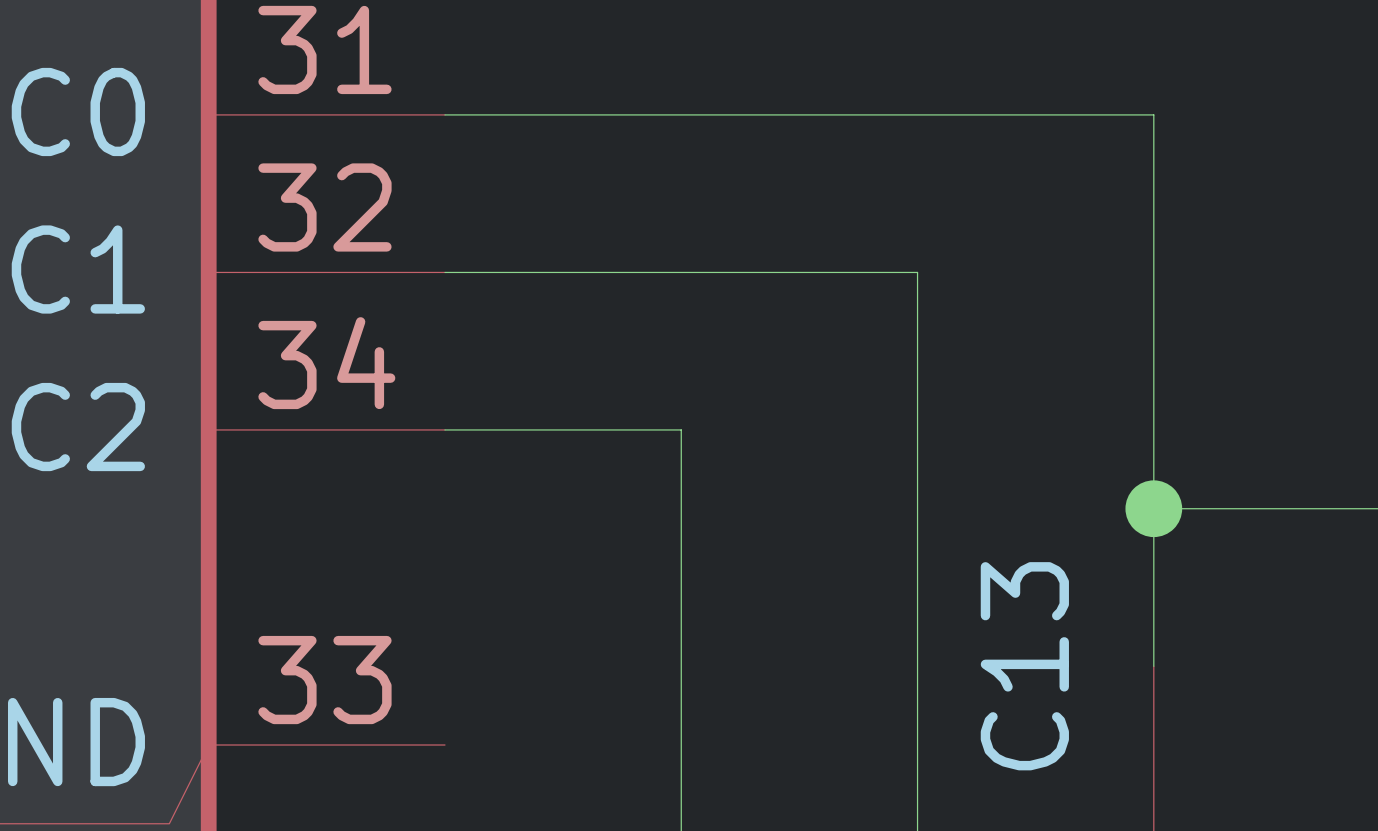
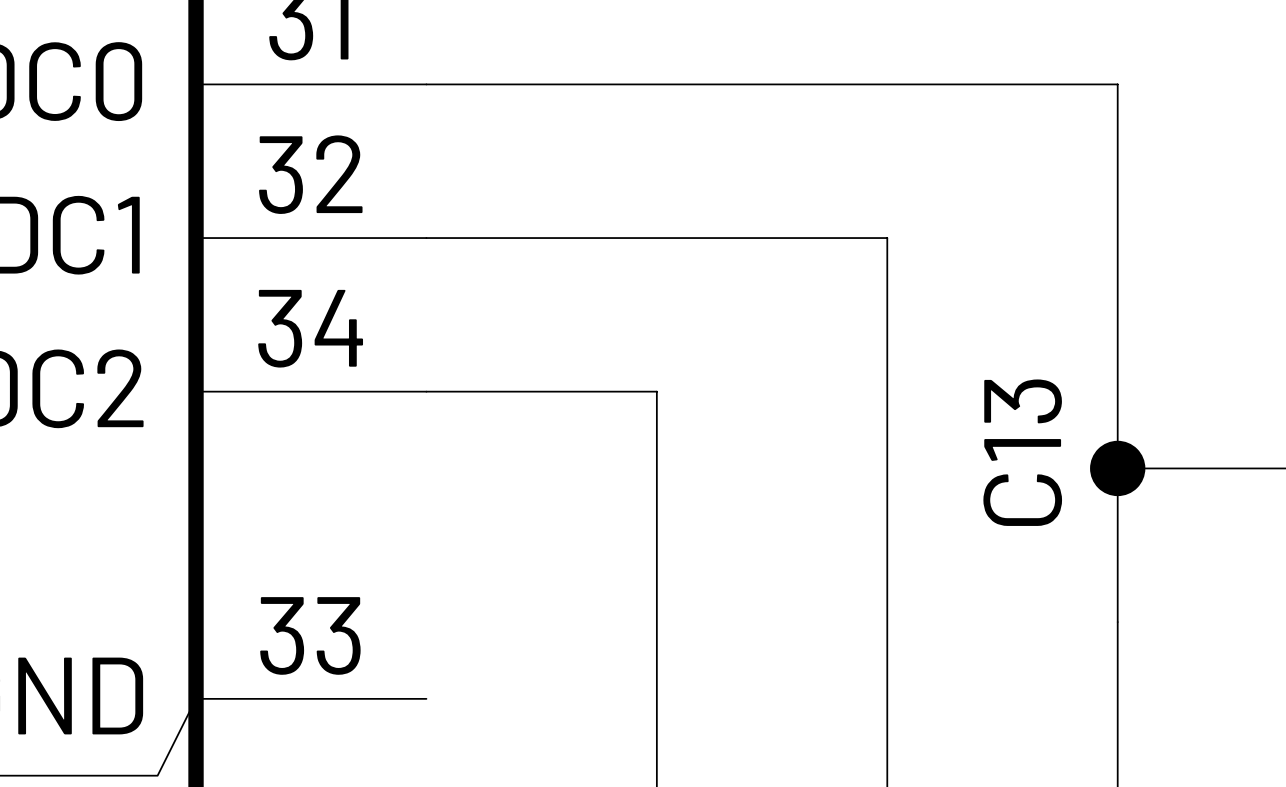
C13 name position: C13 (1024, 666) -> C13 (1022, 452)

